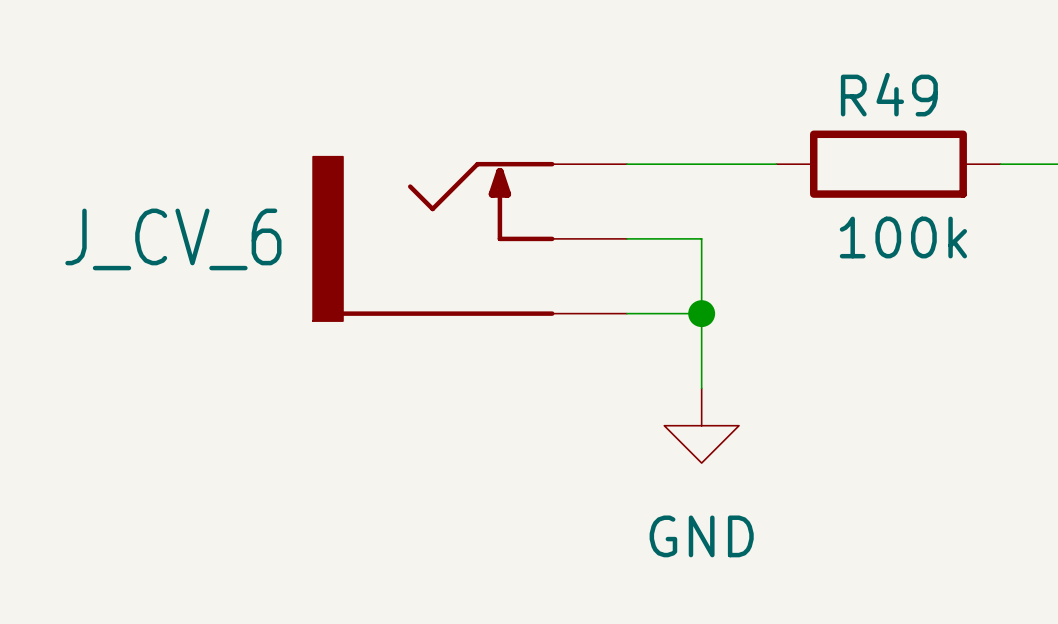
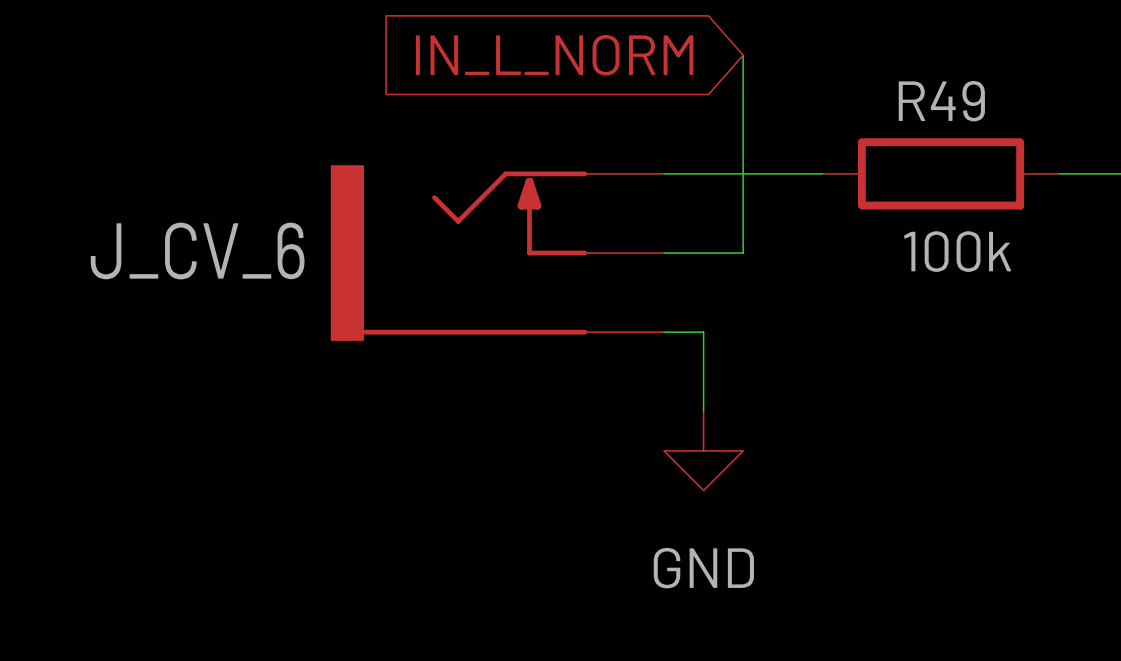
global label: none -> IN_L_NORM (554, 55)
wire: (701, 238) (701, 388) -> (743, 253) (743, 55)
wire: (664, 313) (701, 313) -> (703, 332) (703, 411)
junction: (701, 313) -> none
power symbol position: GND (701, 425) -> GND (703, 450)

